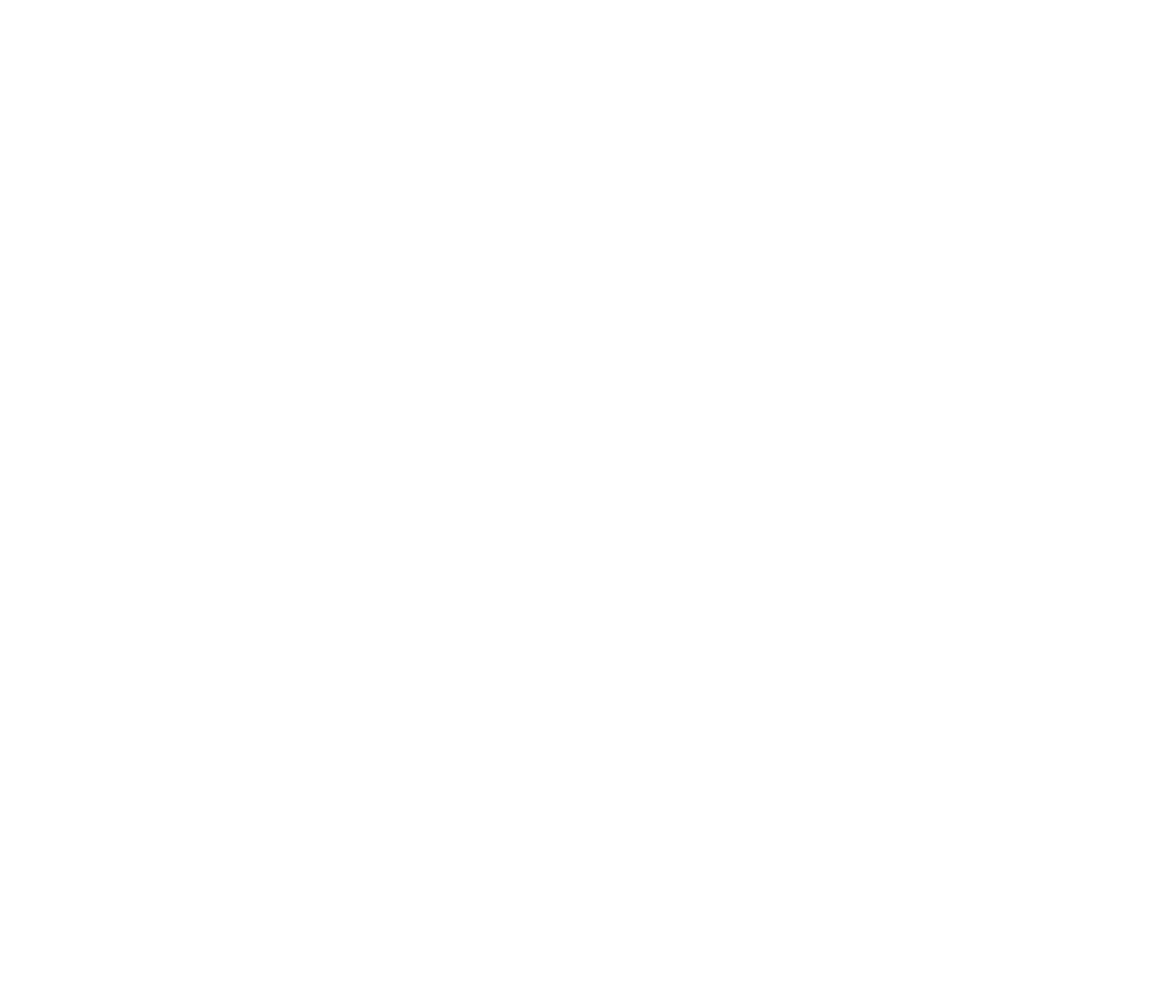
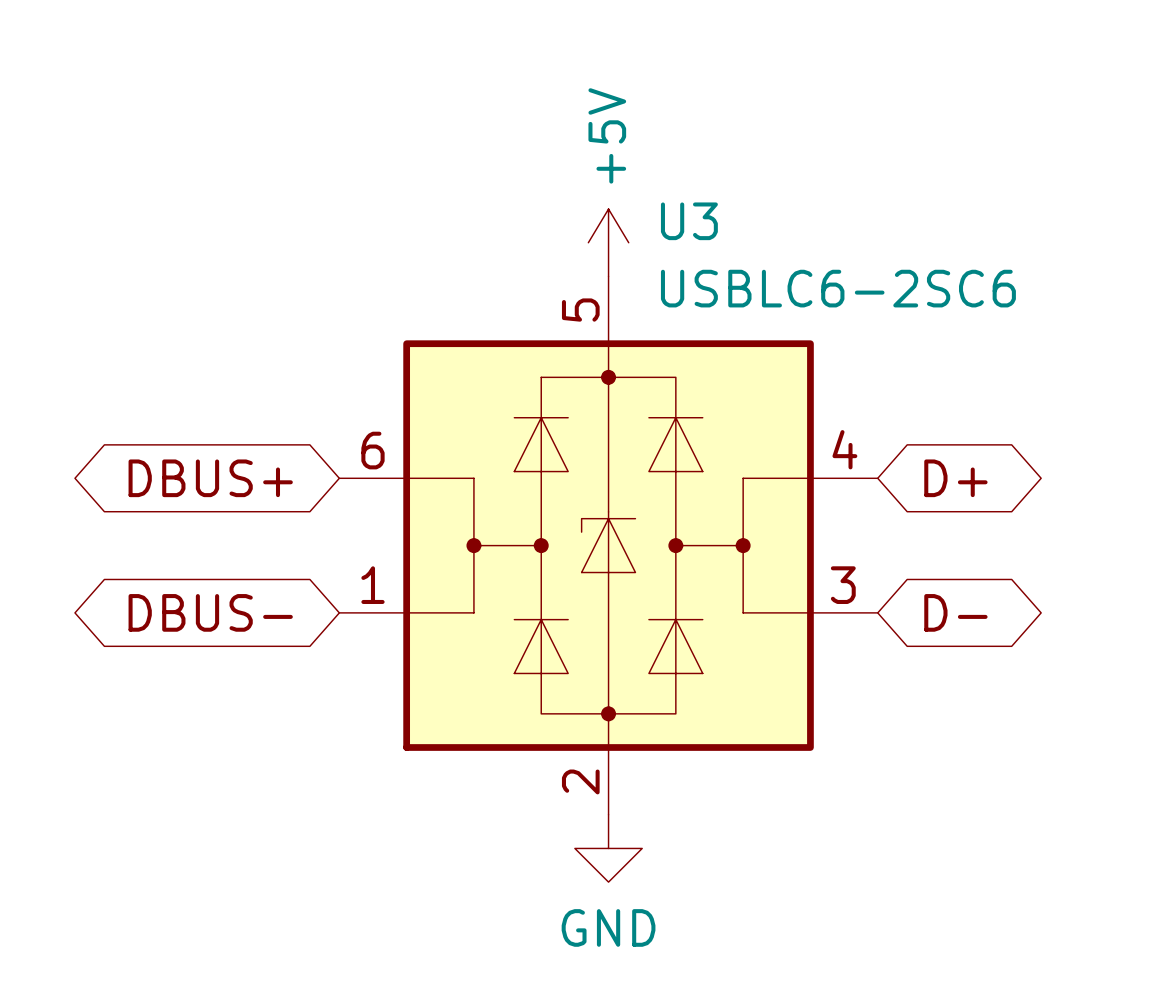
power symbol: none -> +5V (608, 242)
global label: none -> DBUS+ (210, 478)
global label: none -> D+ (955, 478)
U3: none -> USBLC6-2SC6 (608, 545)
global label: none -> DBUS- (210, 612)
global label: none -> D- (955, 612)
power symbol: none -> GND (608, 848)

